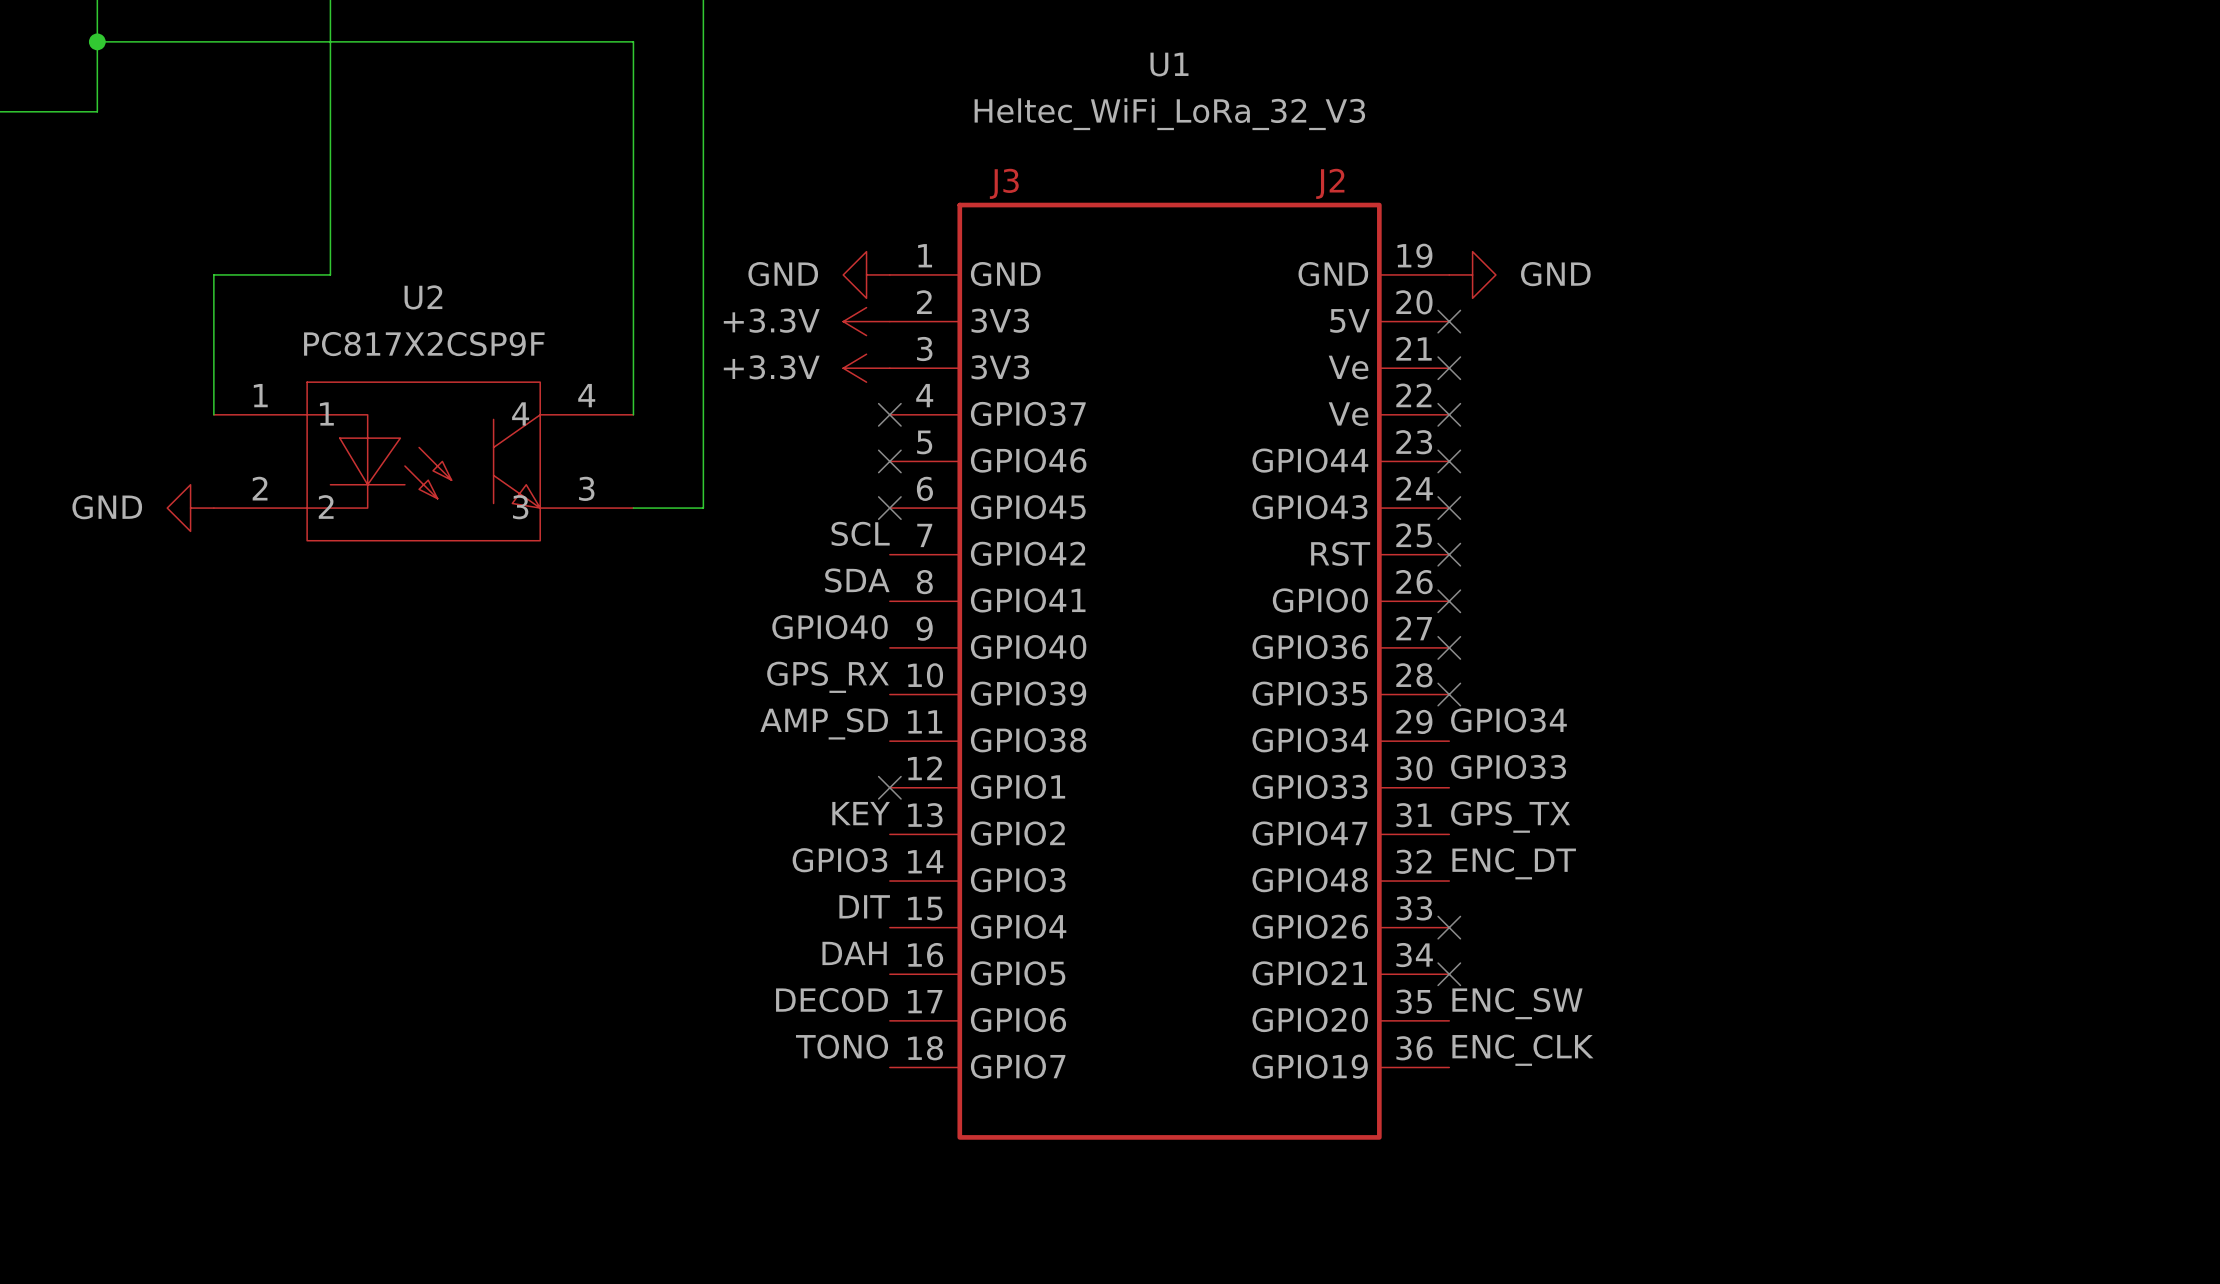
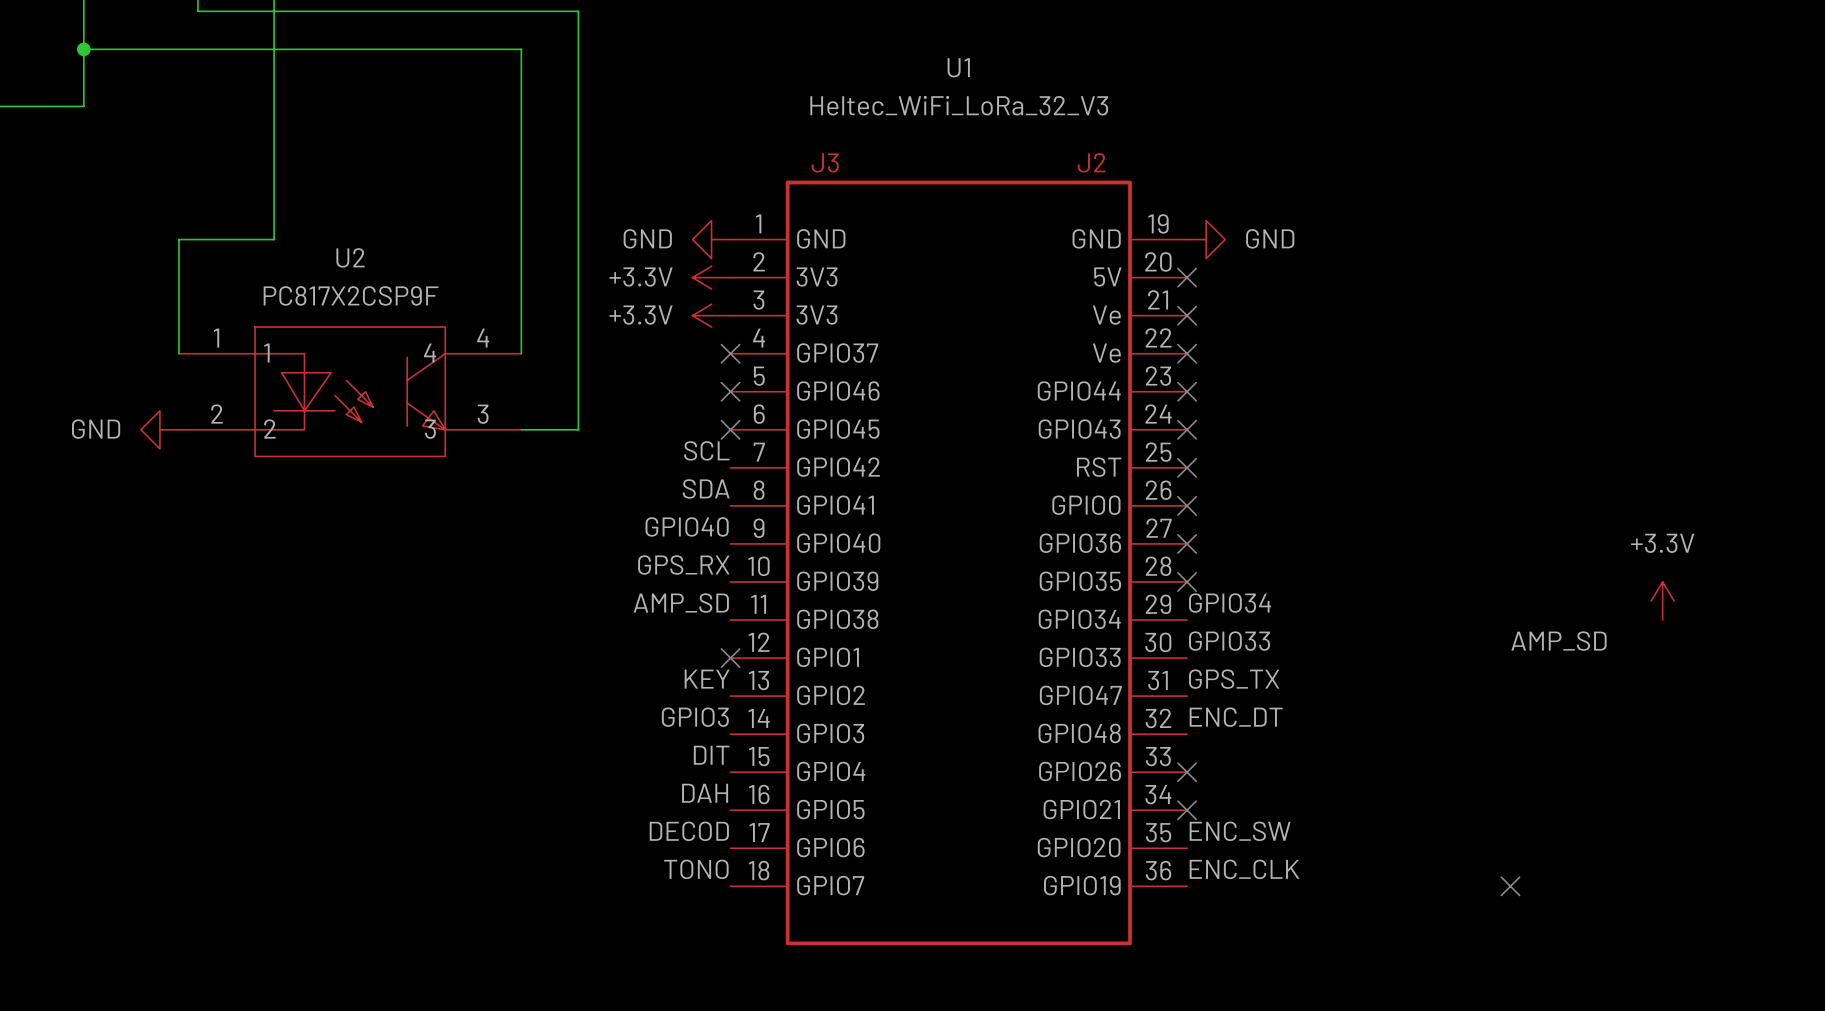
power symbol: none -> +3.3V (1662, 600)
label: none -> AMP_SD (1558, 641)
no-connect mark: none -> (1510, 886)

